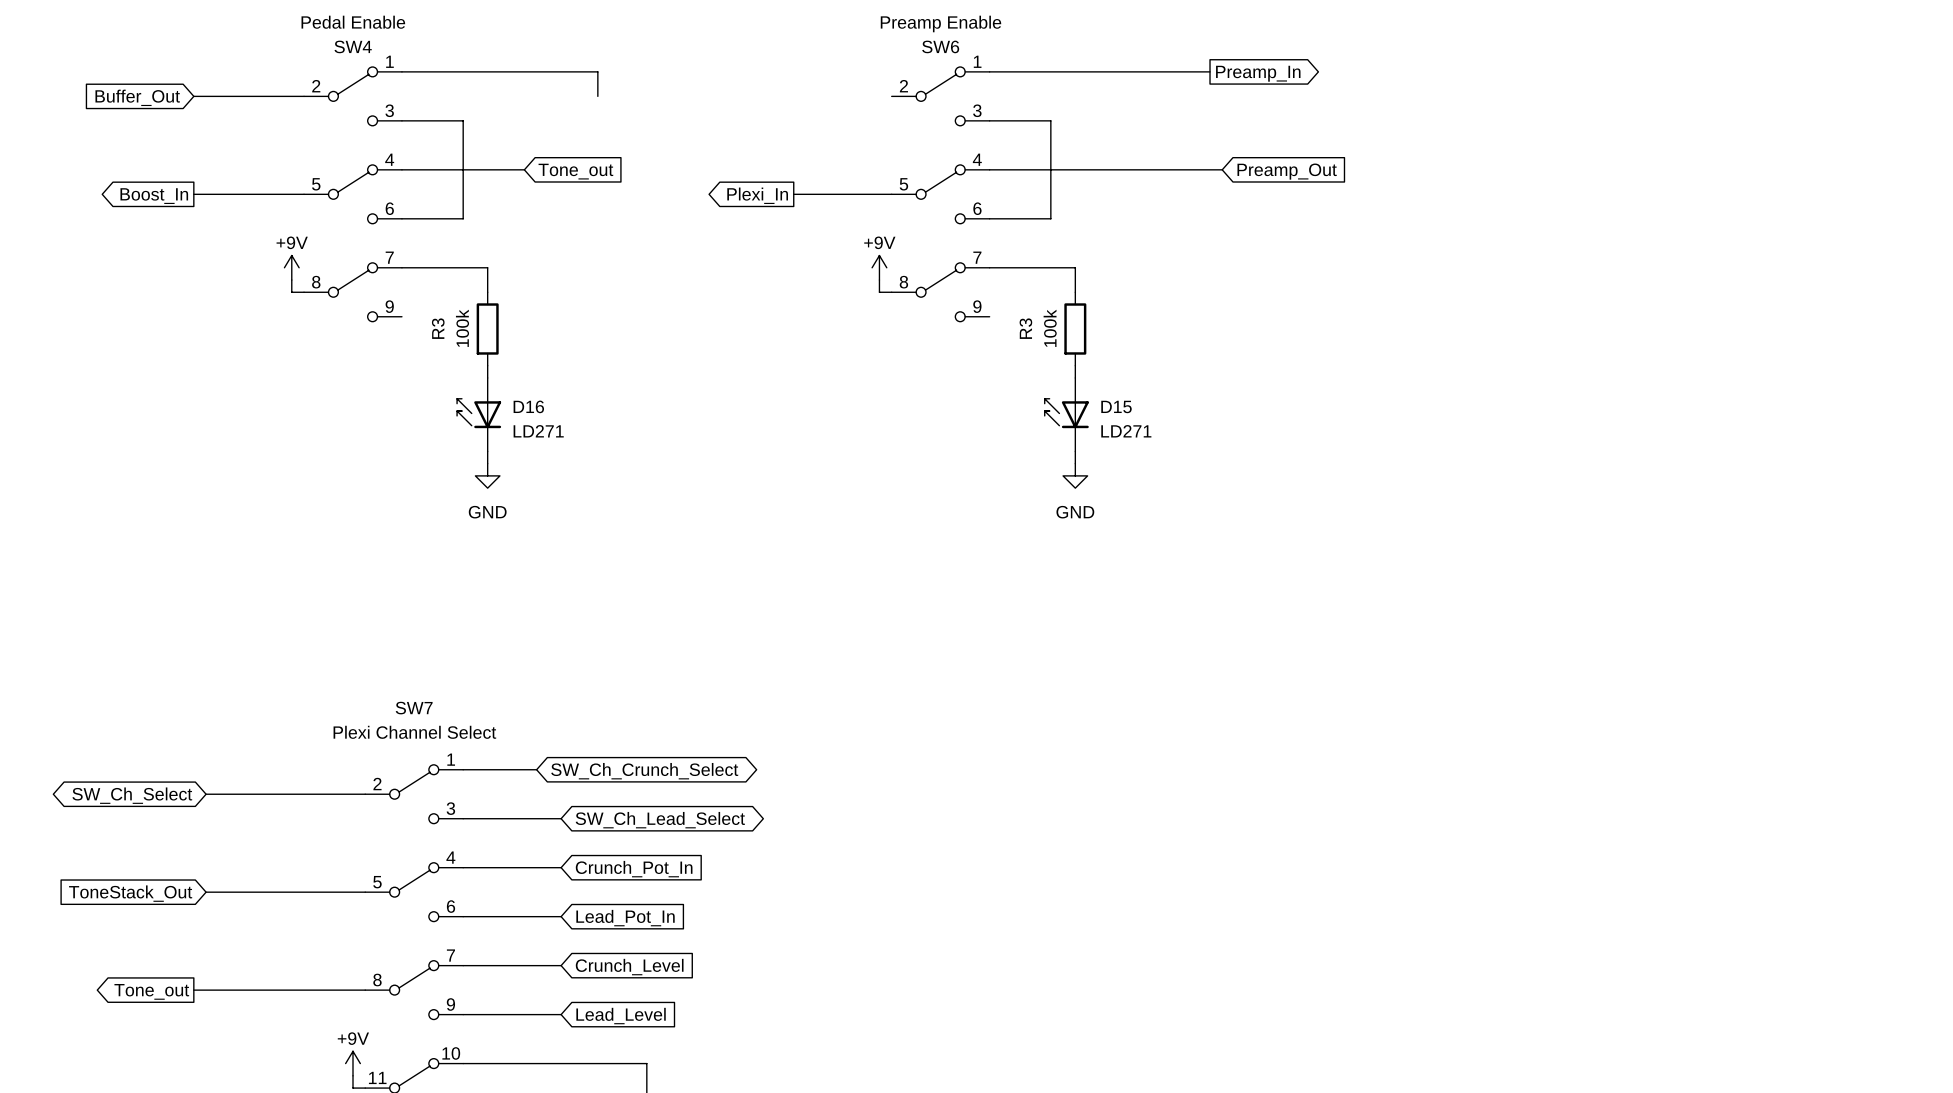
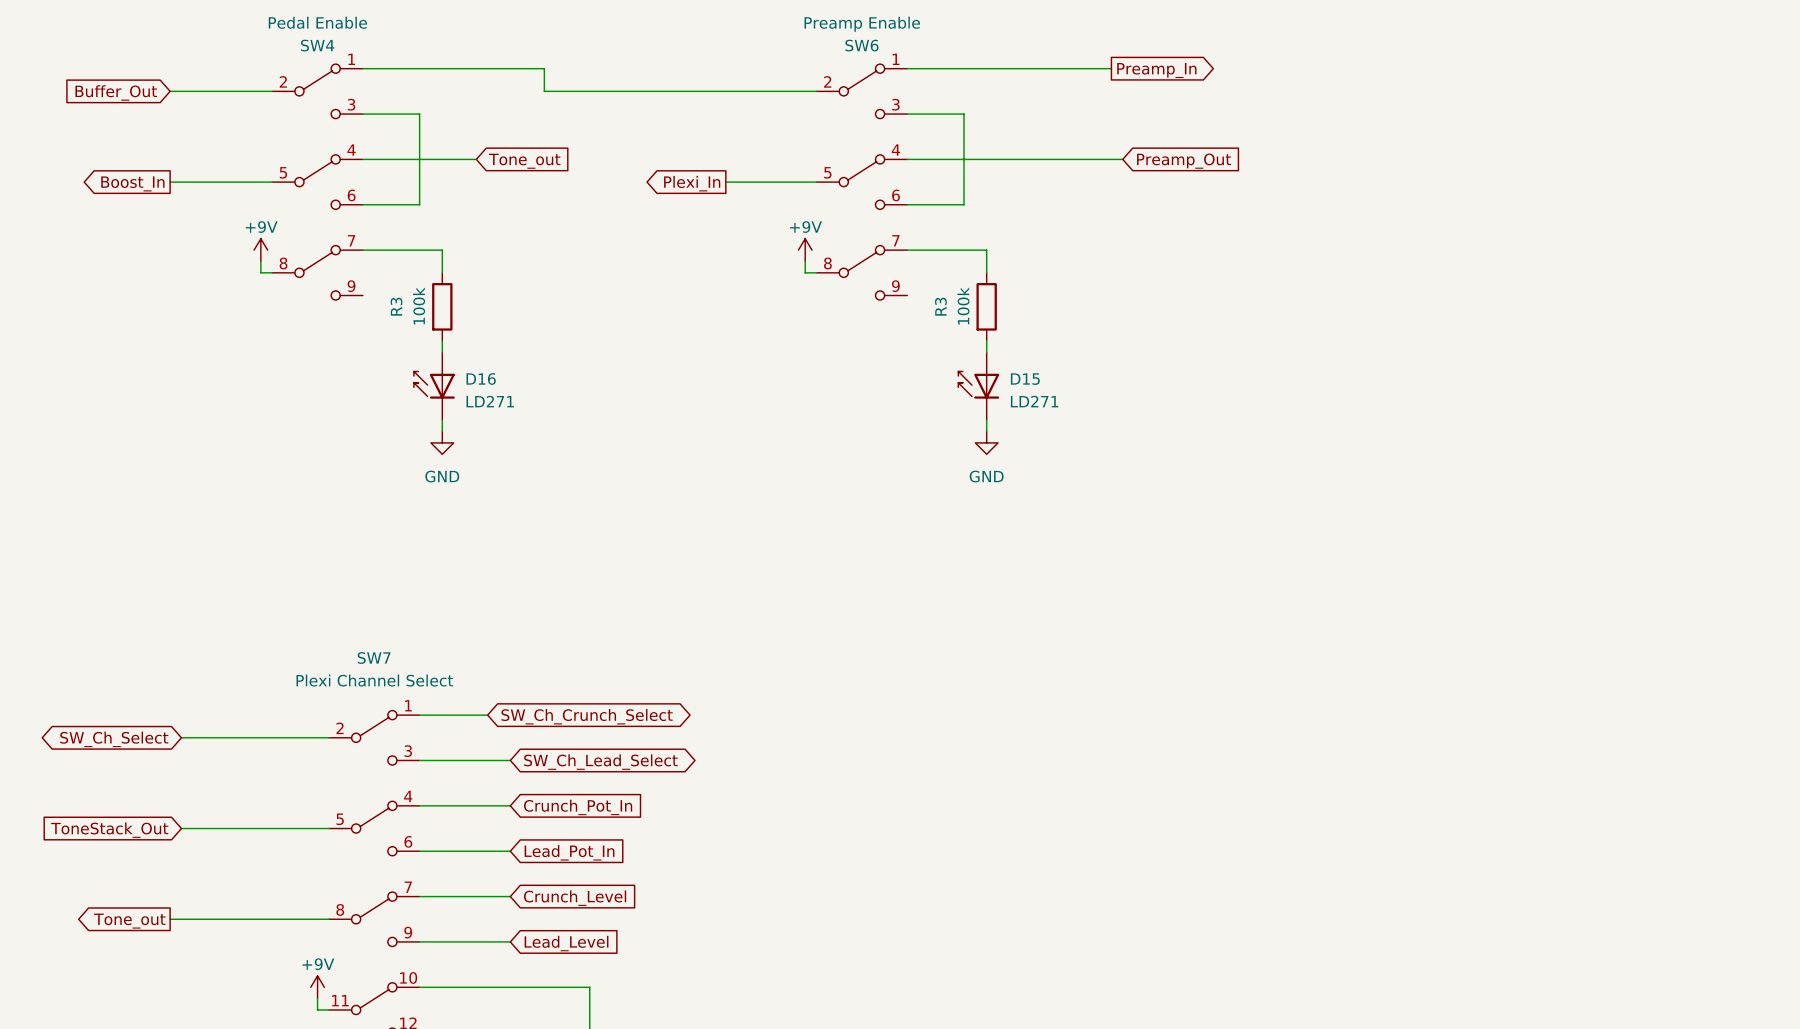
wire: none -> (544, 91) (816, 91)

